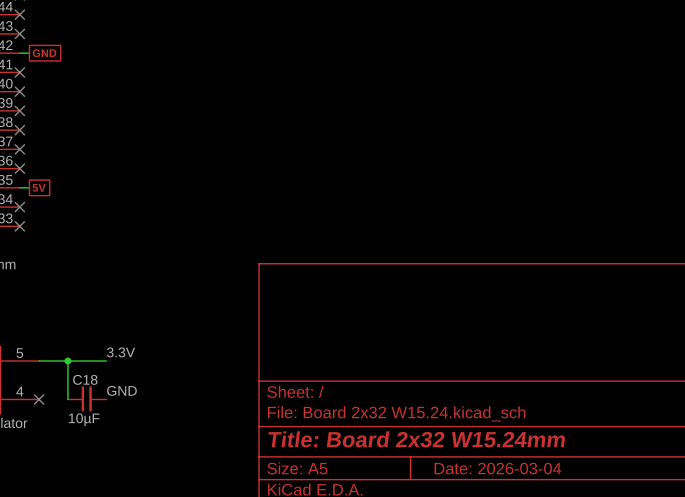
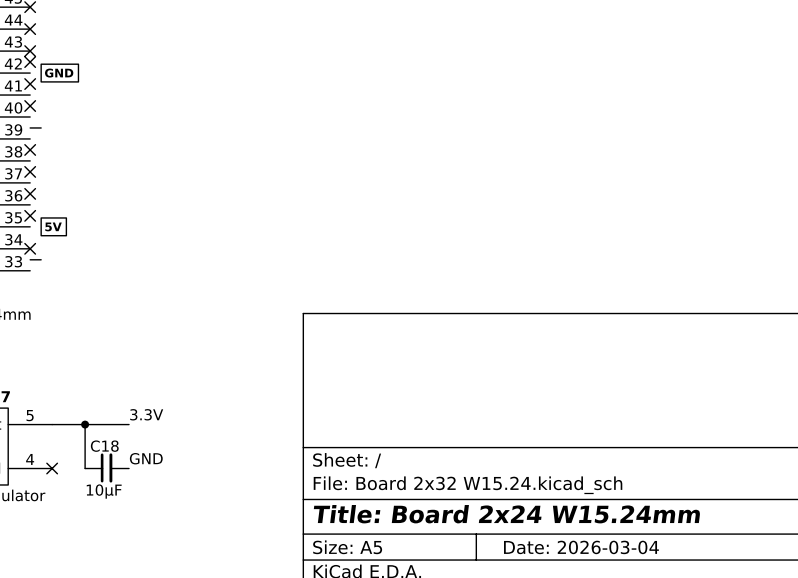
no-connect mark: none -> (30, 62)
wire: (19, 53) (29, 53) -> (30, 127) (41, 127)
no-connect mark: none -> (30, 84)
no-connect mark: (19, 72) -> none
no-connect mark: none -> (30, 106)
no-connect mark: (19, 91) -> none
no-connect mark: (19, 110) -> none
no-connect mark: none -> (30, 149)
no-connect mark: (19, 130) -> none
no-connect mark: none -> (30, 171)
no-connect mark: (19, 149) -> none
no-connect mark: none -> (30, 193)
no-connect mark: (19, 168) -> none
no-connect mark: none -> (30, 215)
wire: (19, 187) (29, 187) -> (30, 259) (41, 259)
no-connect mark: (19, 226) -> none
title block: Title: Board 2x32 W15.24mm (416, 439) -> Title: Board 2x24 W15.24mm (507, 514)

